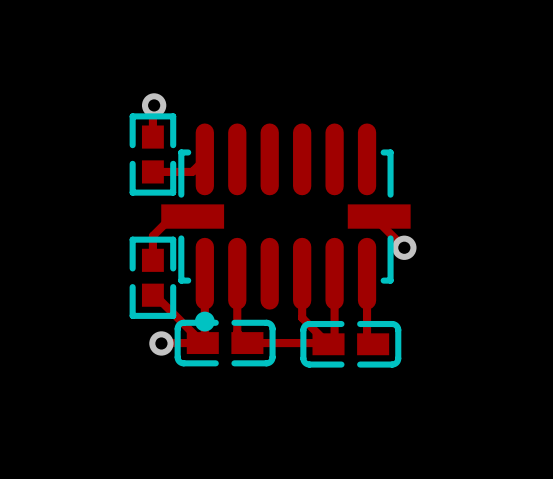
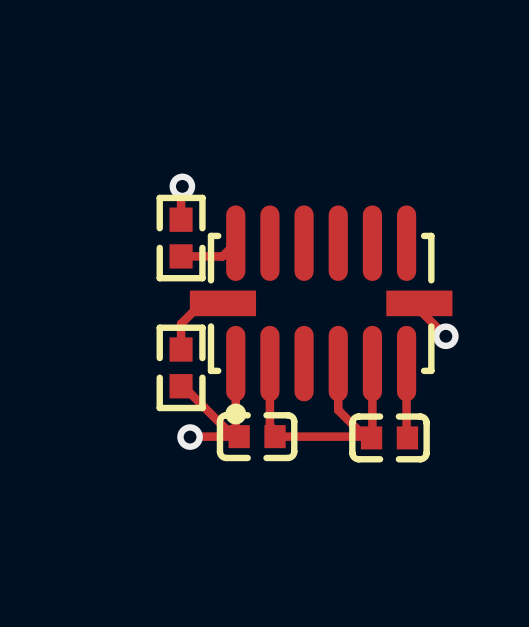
part footprint: [174, 319, 276, 367] -> [216, 412, 298, 462]
part footprint: [300, 320, 402, 368] -> [349, 413, 430, 463]

